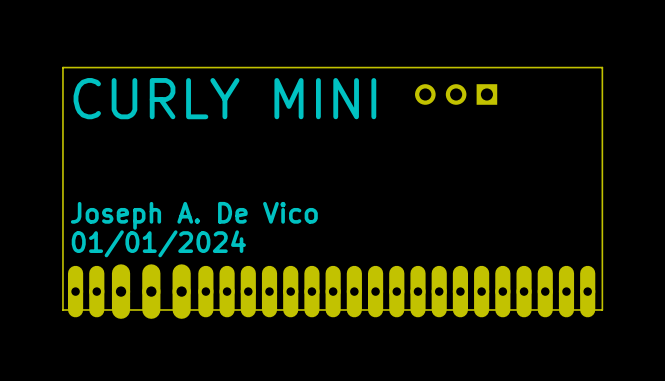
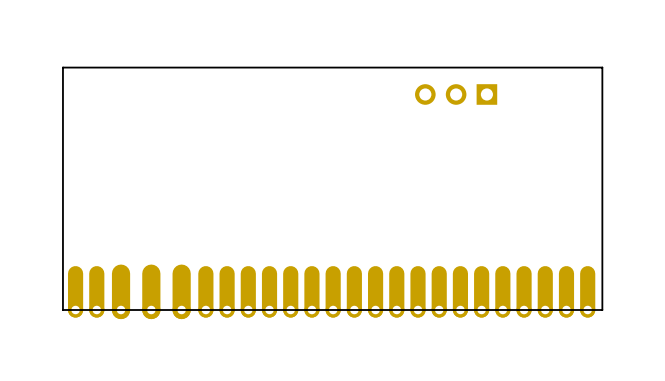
text: CURLY MINI (224, 98) -> none
text: Joseph A. De Vico (194, 215) -> none
text: 01/01/2024 (158, 243) -> none
part footprint: [68, 264, 596, 319] -> [68, 264, 596, 320]

